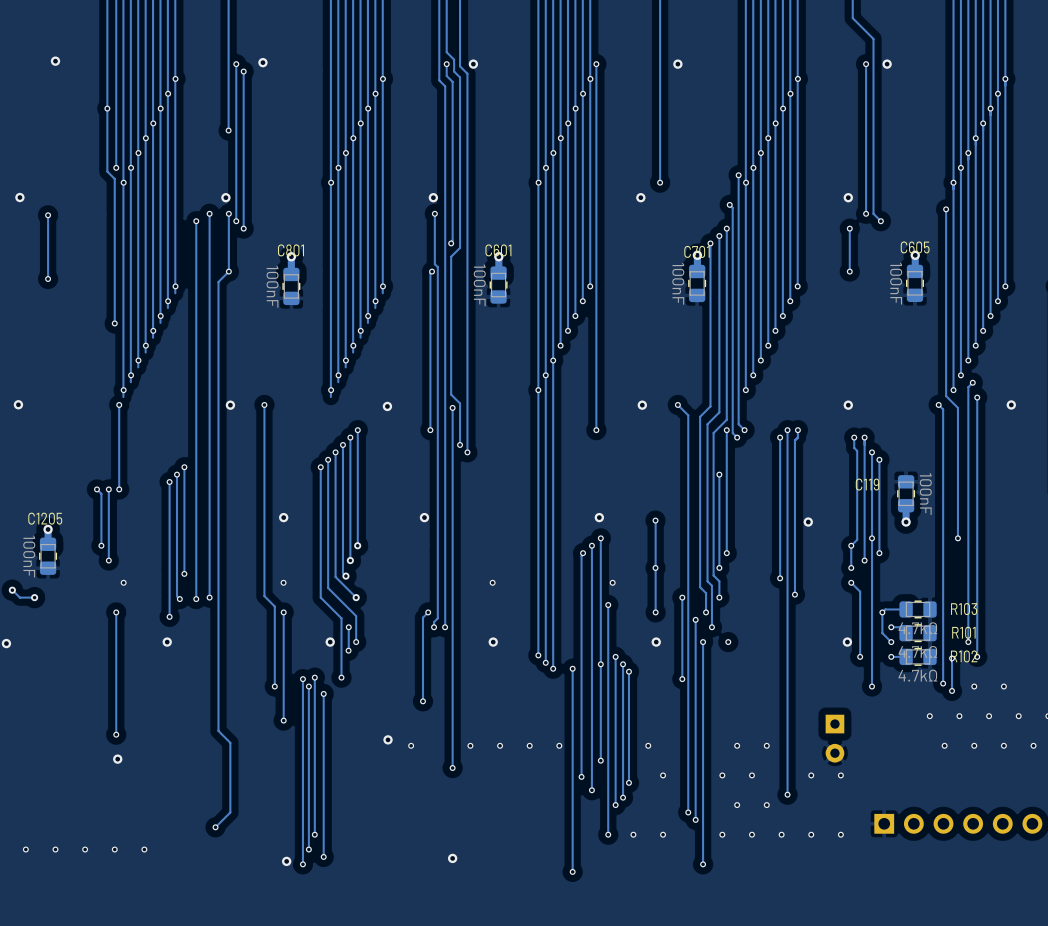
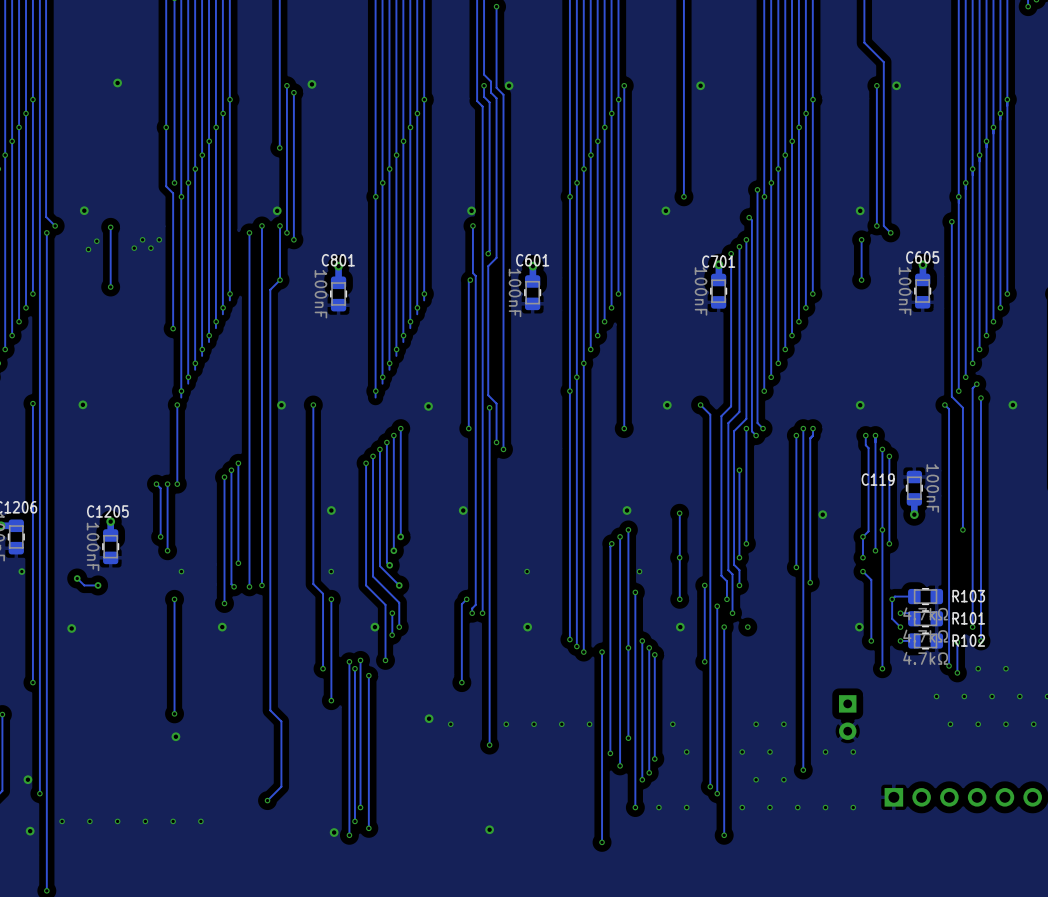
via: none -> (142, 239)
via: none -> (159, 239)
via: none -> (96, 241)
via: none -> (134, 248)
via: none -> (150, 248)
via: none -> (88, 249)

